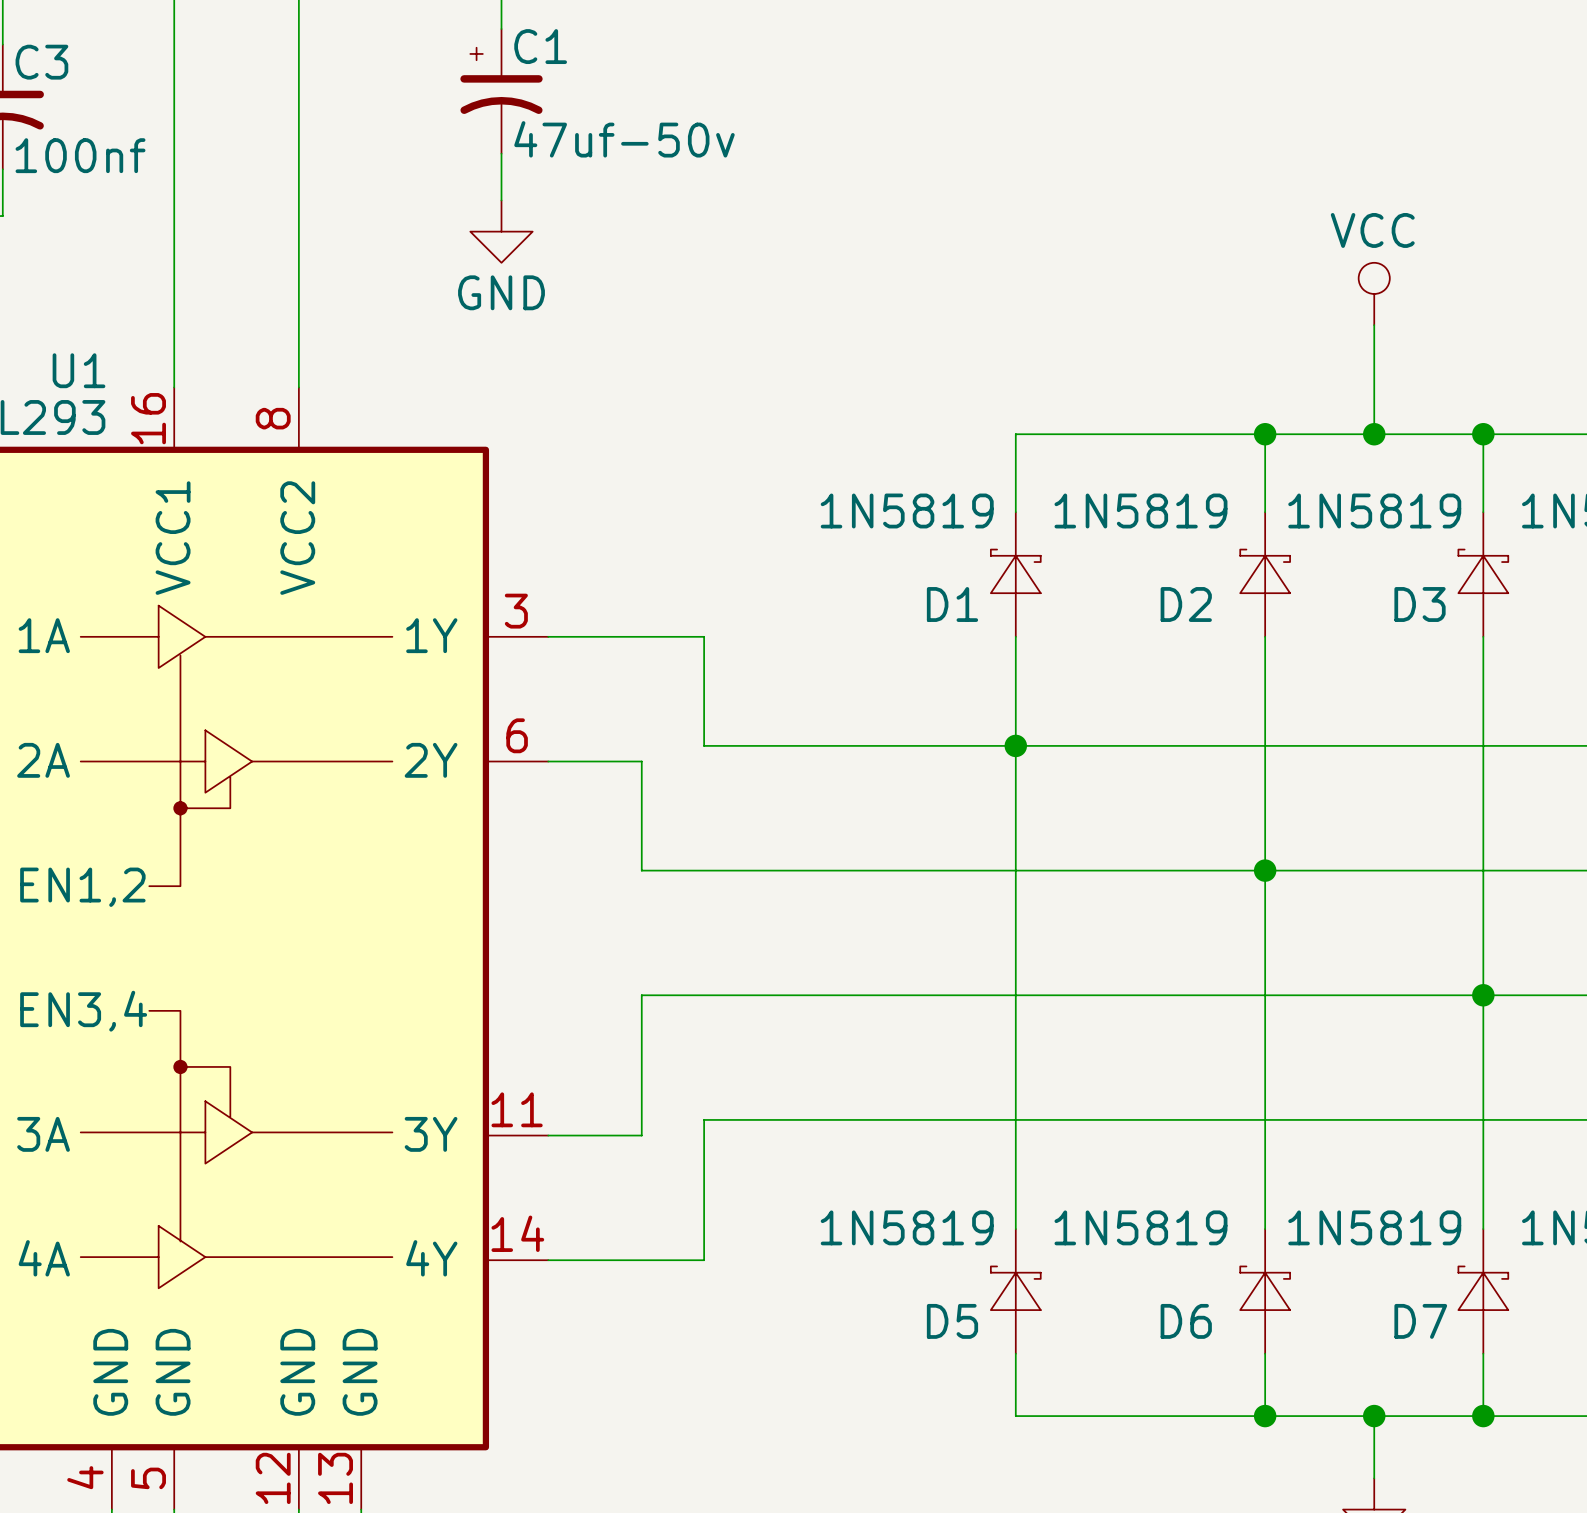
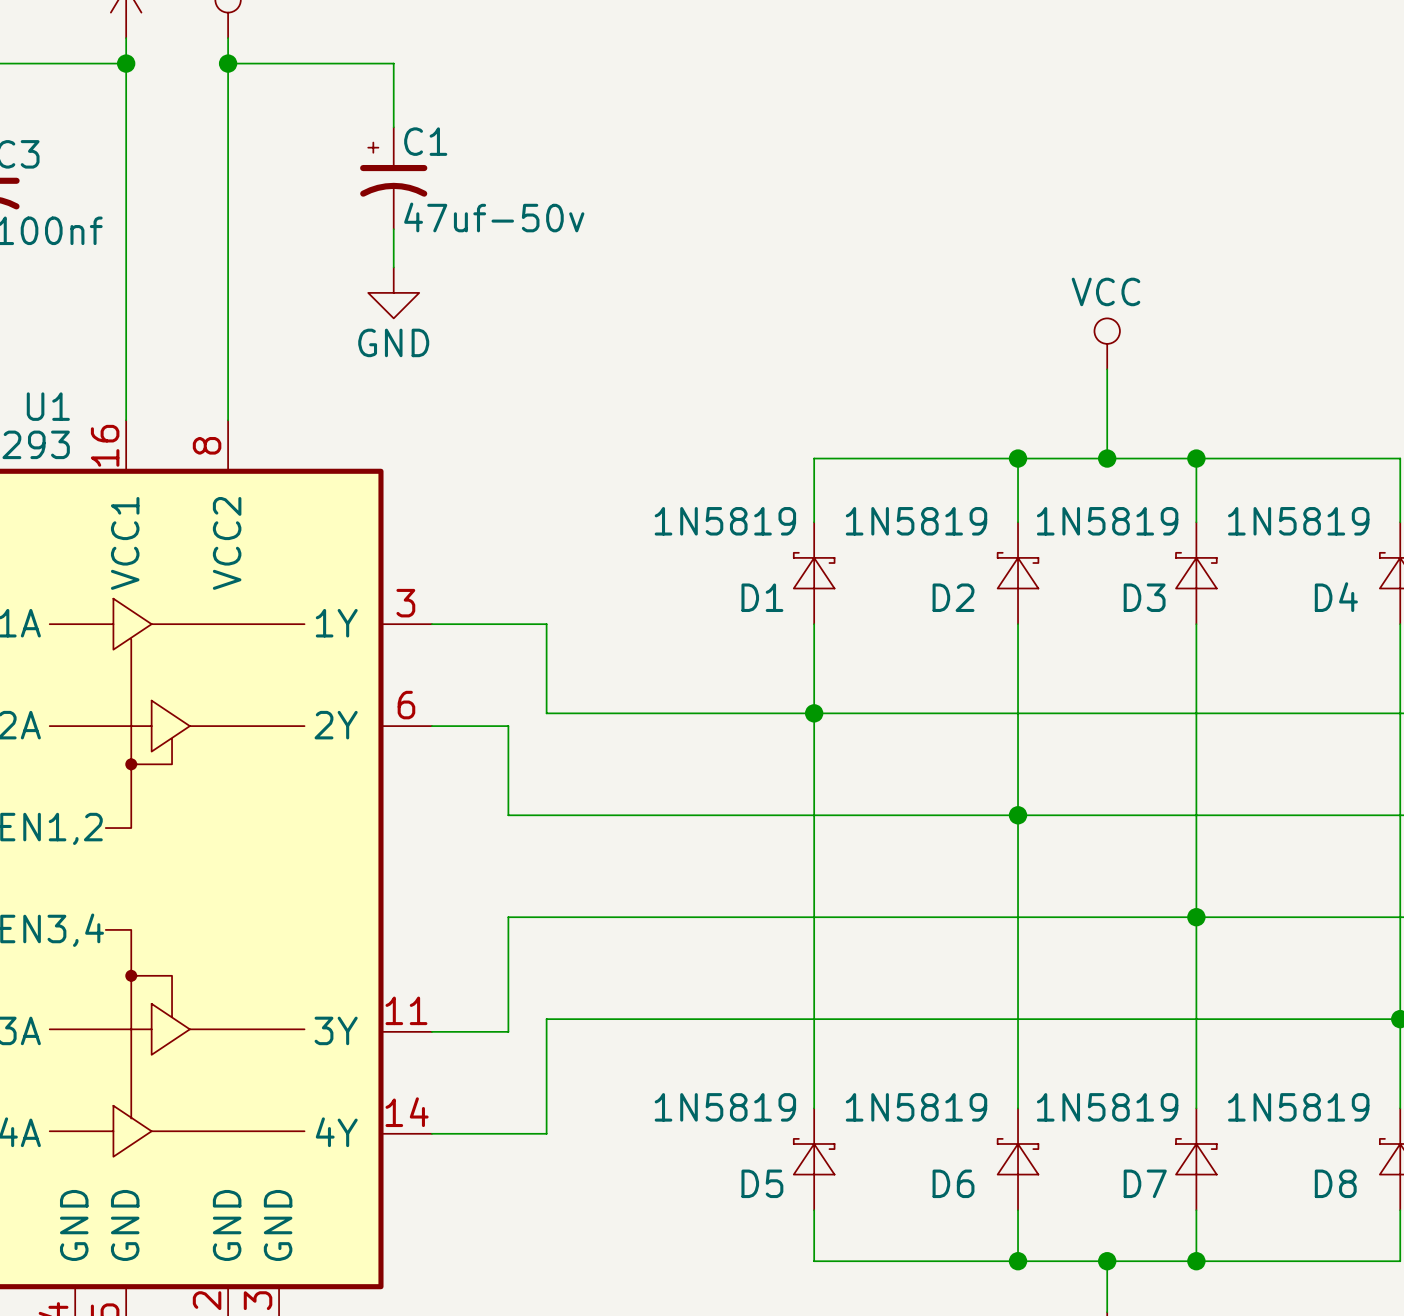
wire: (688, 636) (704, 636) (704, 745) -> (546, 624) (546, 713) (559, 713)
wire: (704, 1119) (704, 1260) (688, 1260) -> (559, 1019) (546, 1019) (546, 1133)

